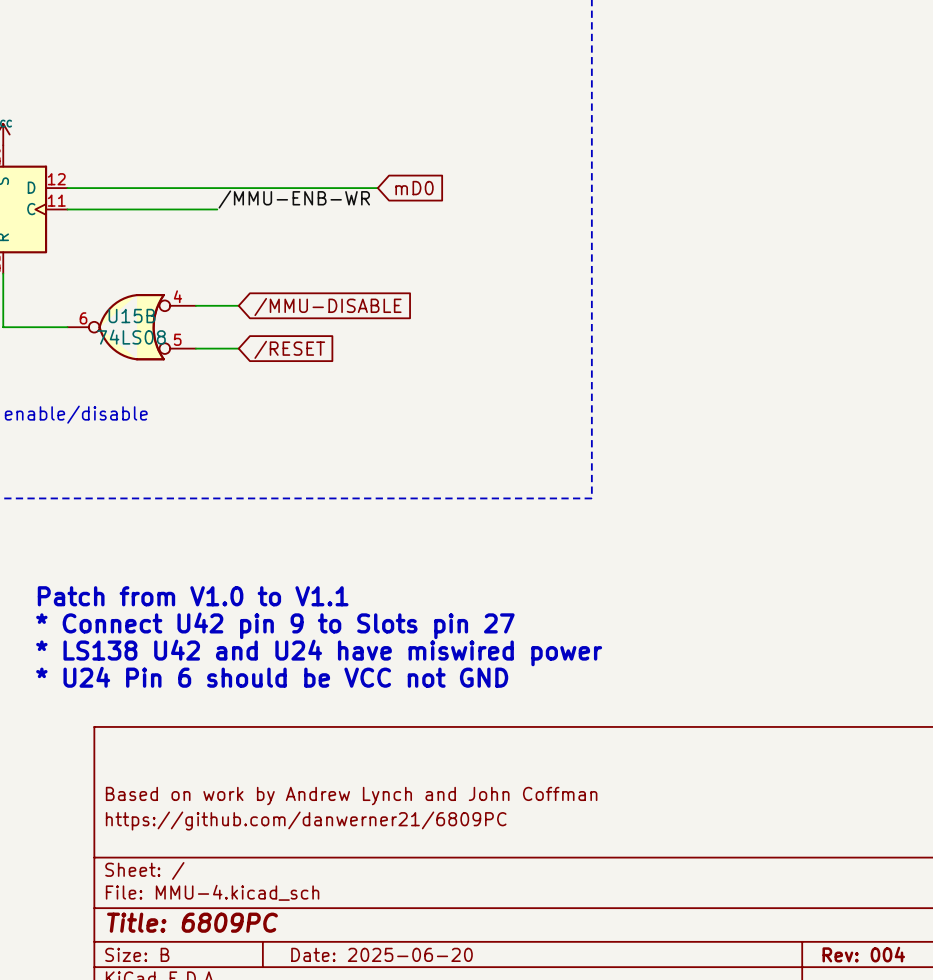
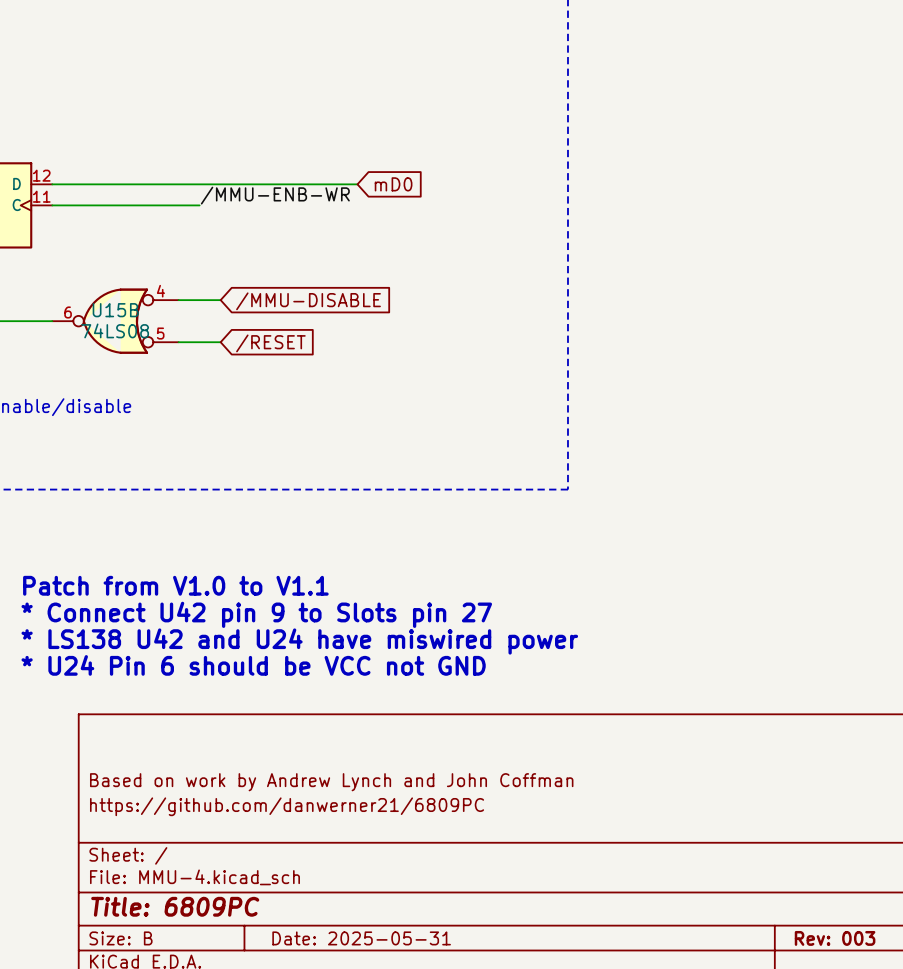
title block: Date: 2025-06-20 (382, 954) -> Date: 2025-05-31 (361, 938)
title block: Rev: 004 (863, 954) -> Rev: 003 (835, 938)

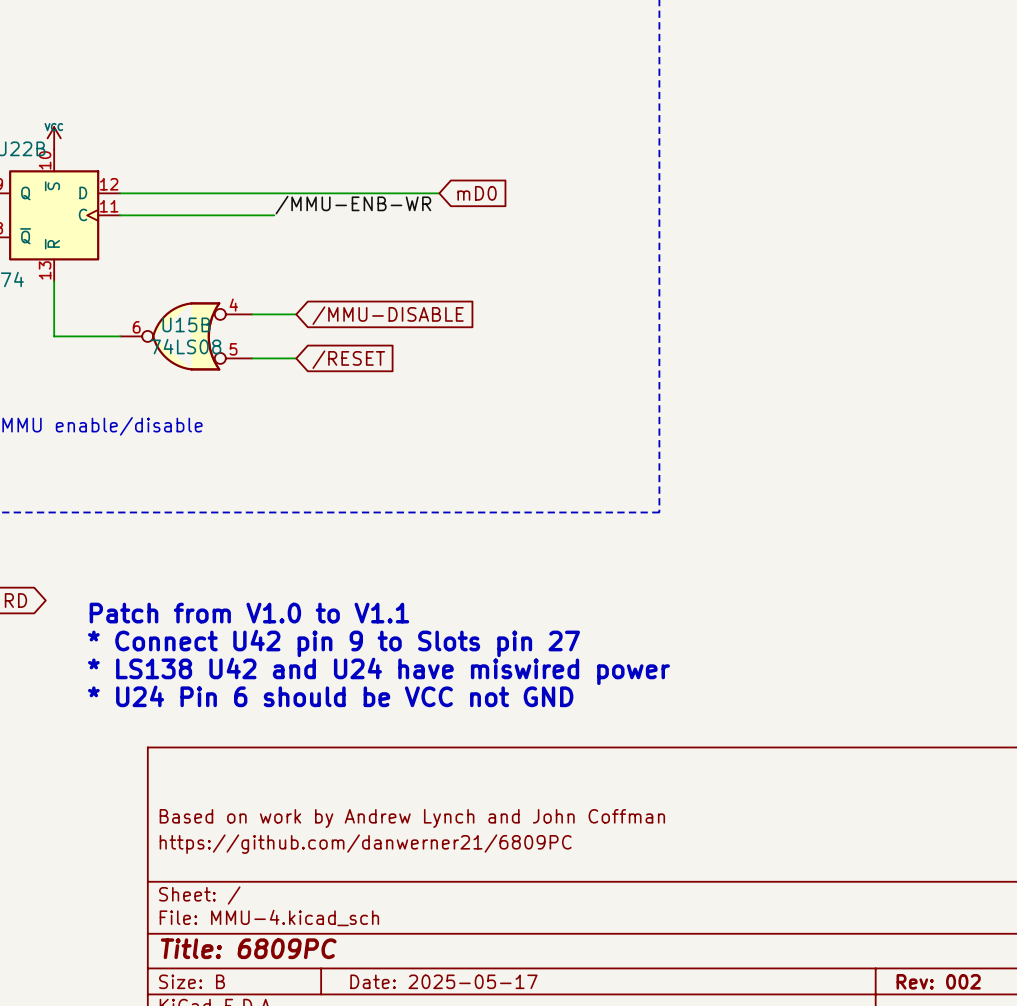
title block: Date: 2025-05-31 (361, 938) -> Date: 2025-05-17 (443, 981)
title block: Rev: 003 (835, 938) -> Rev: 002 (938, 981)

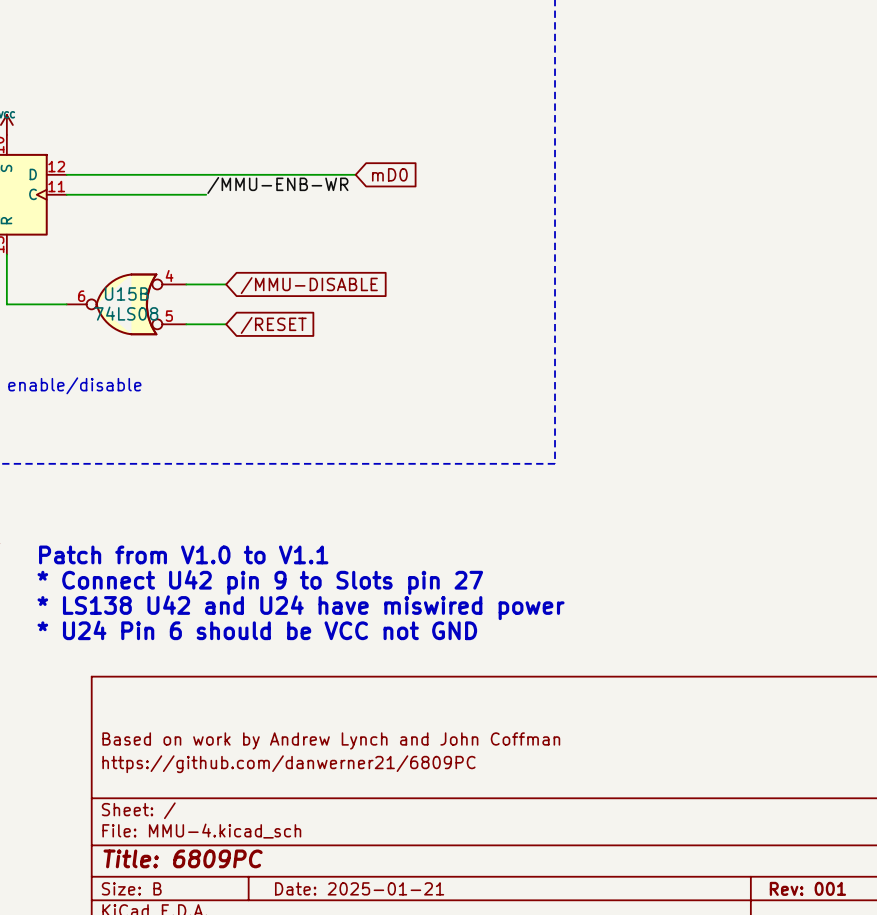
title block: Date: 2025-05-17 (443, 981) -> Date: 2025-01-21 (359, 888)
title block: Rev: 002 (938, 981) -> Rev: 001 (807, 888)

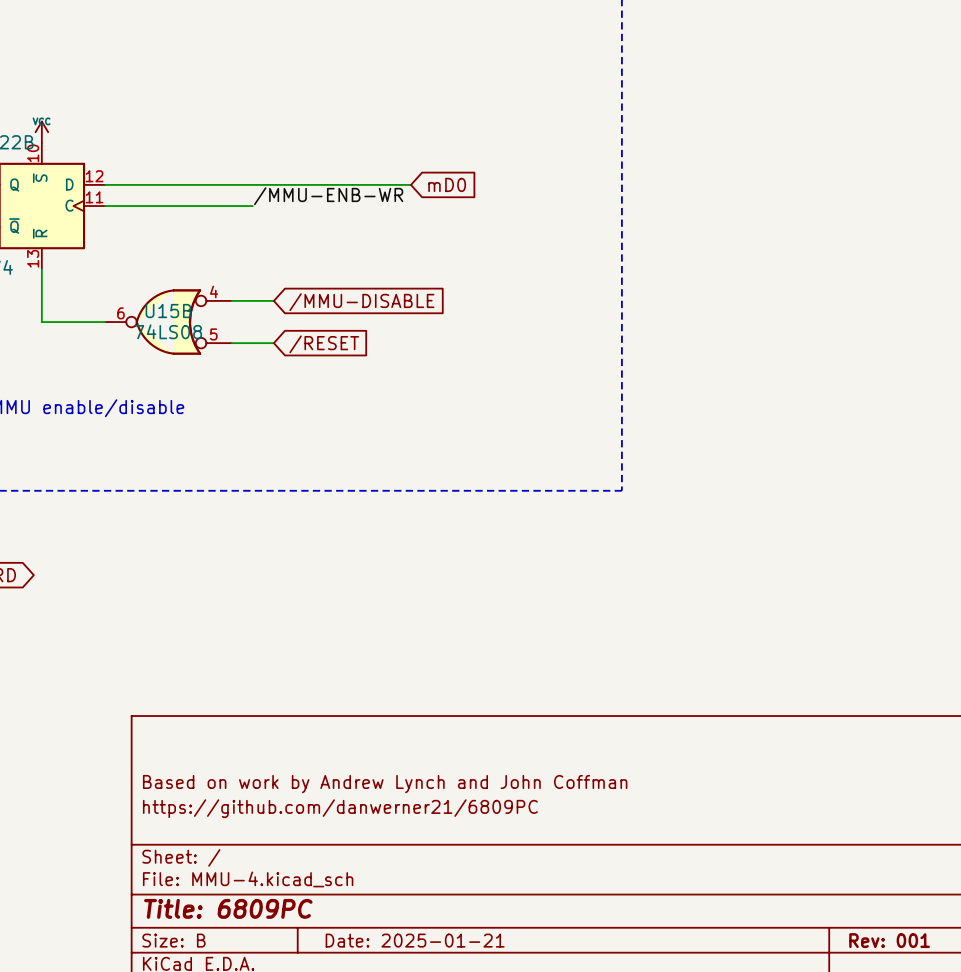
text: Patch from V1.0 to V1.1 (183, 554) -> none
text: * Connect U42 pin 9 to Slots pin 27 (260, 582) -> none
text: * LS138 U42 and U24 have miswired power (301, 607) -> none
text: * U24 Pin 6 should be VCC not GND (257, 630) -> none

